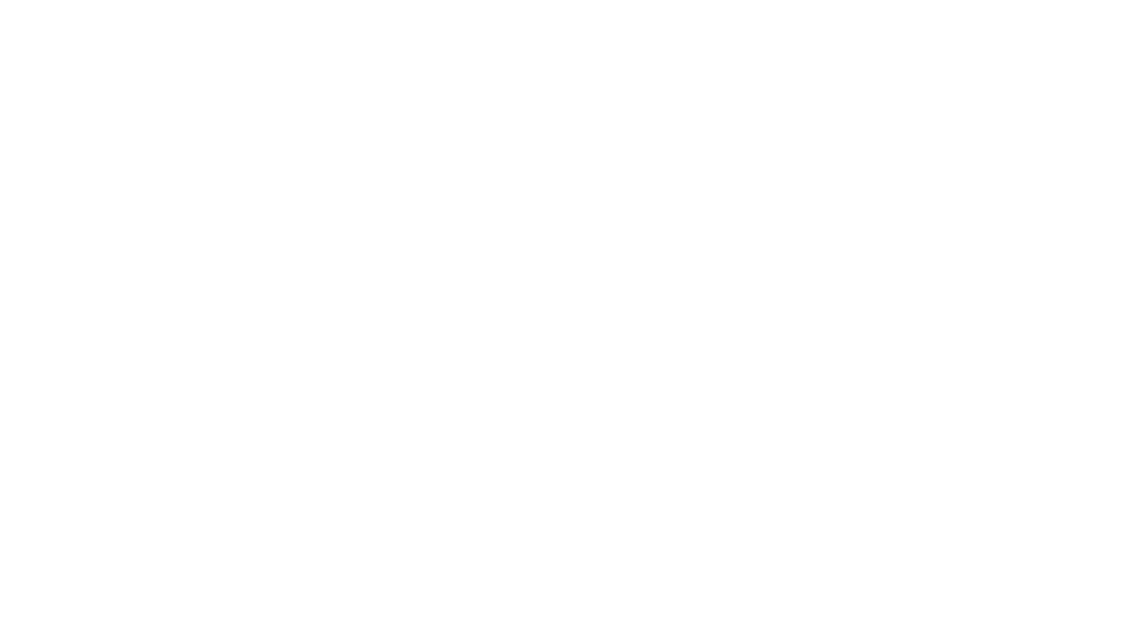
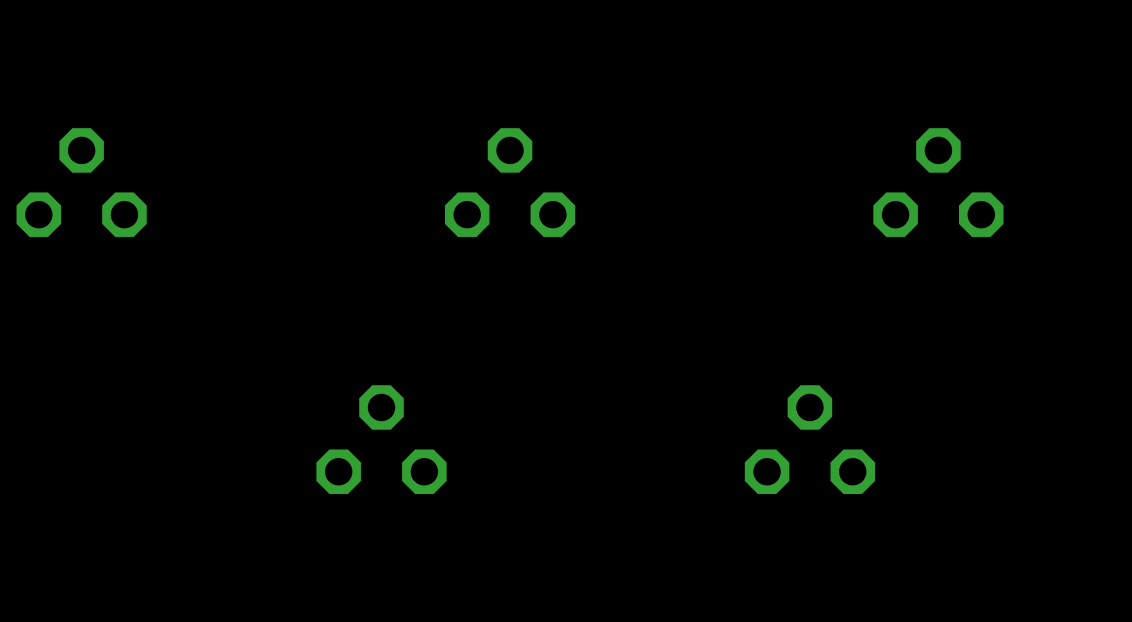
part: none -> (81, 182)
part: none -> (510, 182)
part: none -> (938, 182)
part: none -> (381, 439)
part: none -> (809, 439)

